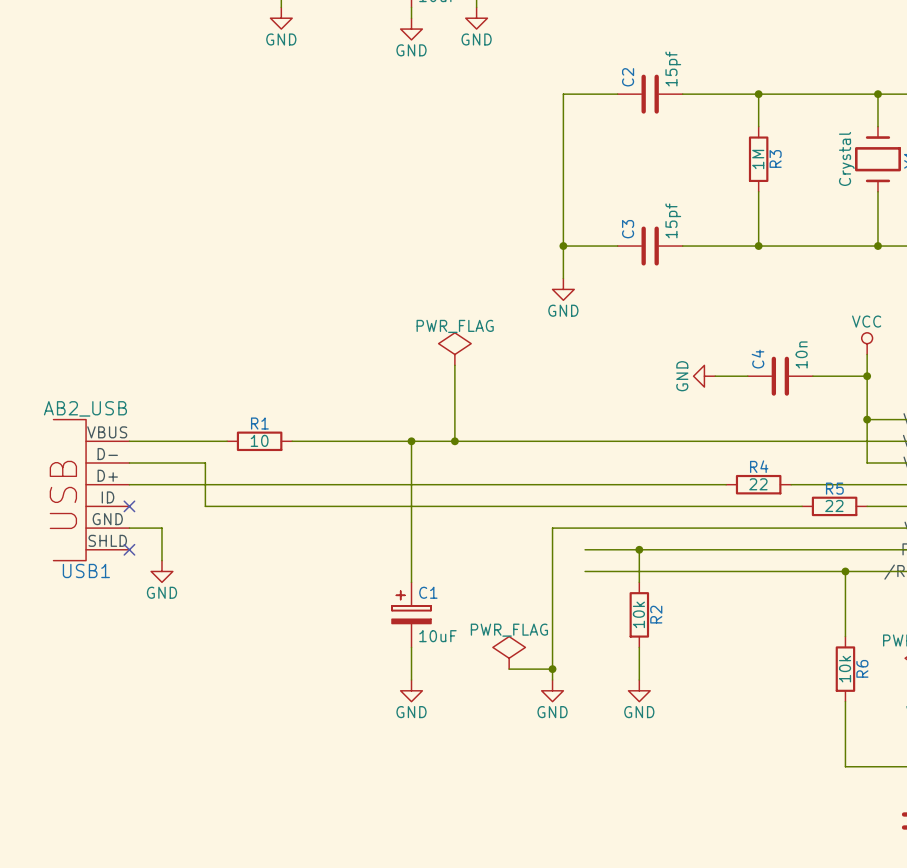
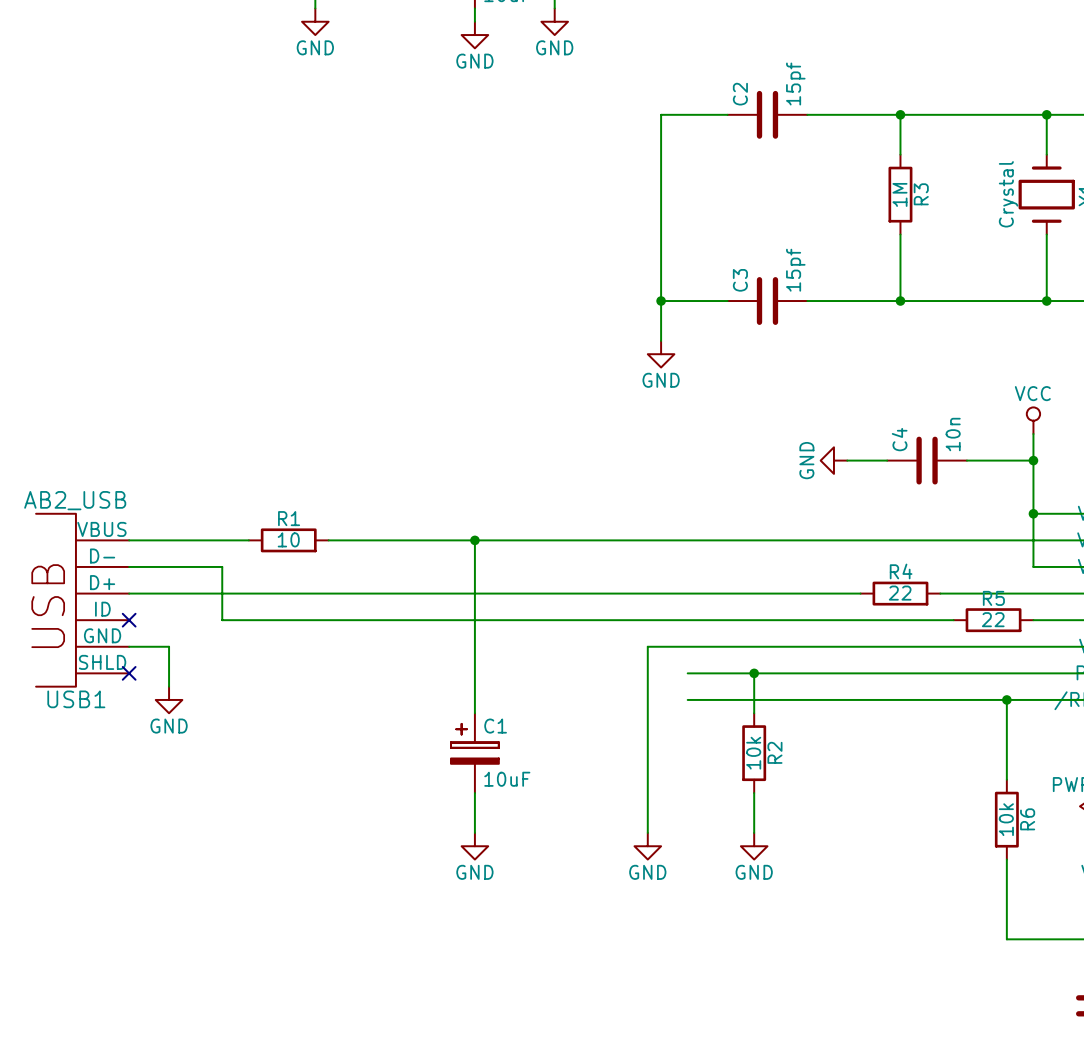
power symbol: PWR_FLAG (454, 349) -> none
wire: (454, 365) (454, 441) -> none
junction: (454, 441) -> none
power symbol: PWR_FLAG (509, 652) -> none
wire: (509, 669) (552, 669) -> none
junction: (552, 669) -> none

